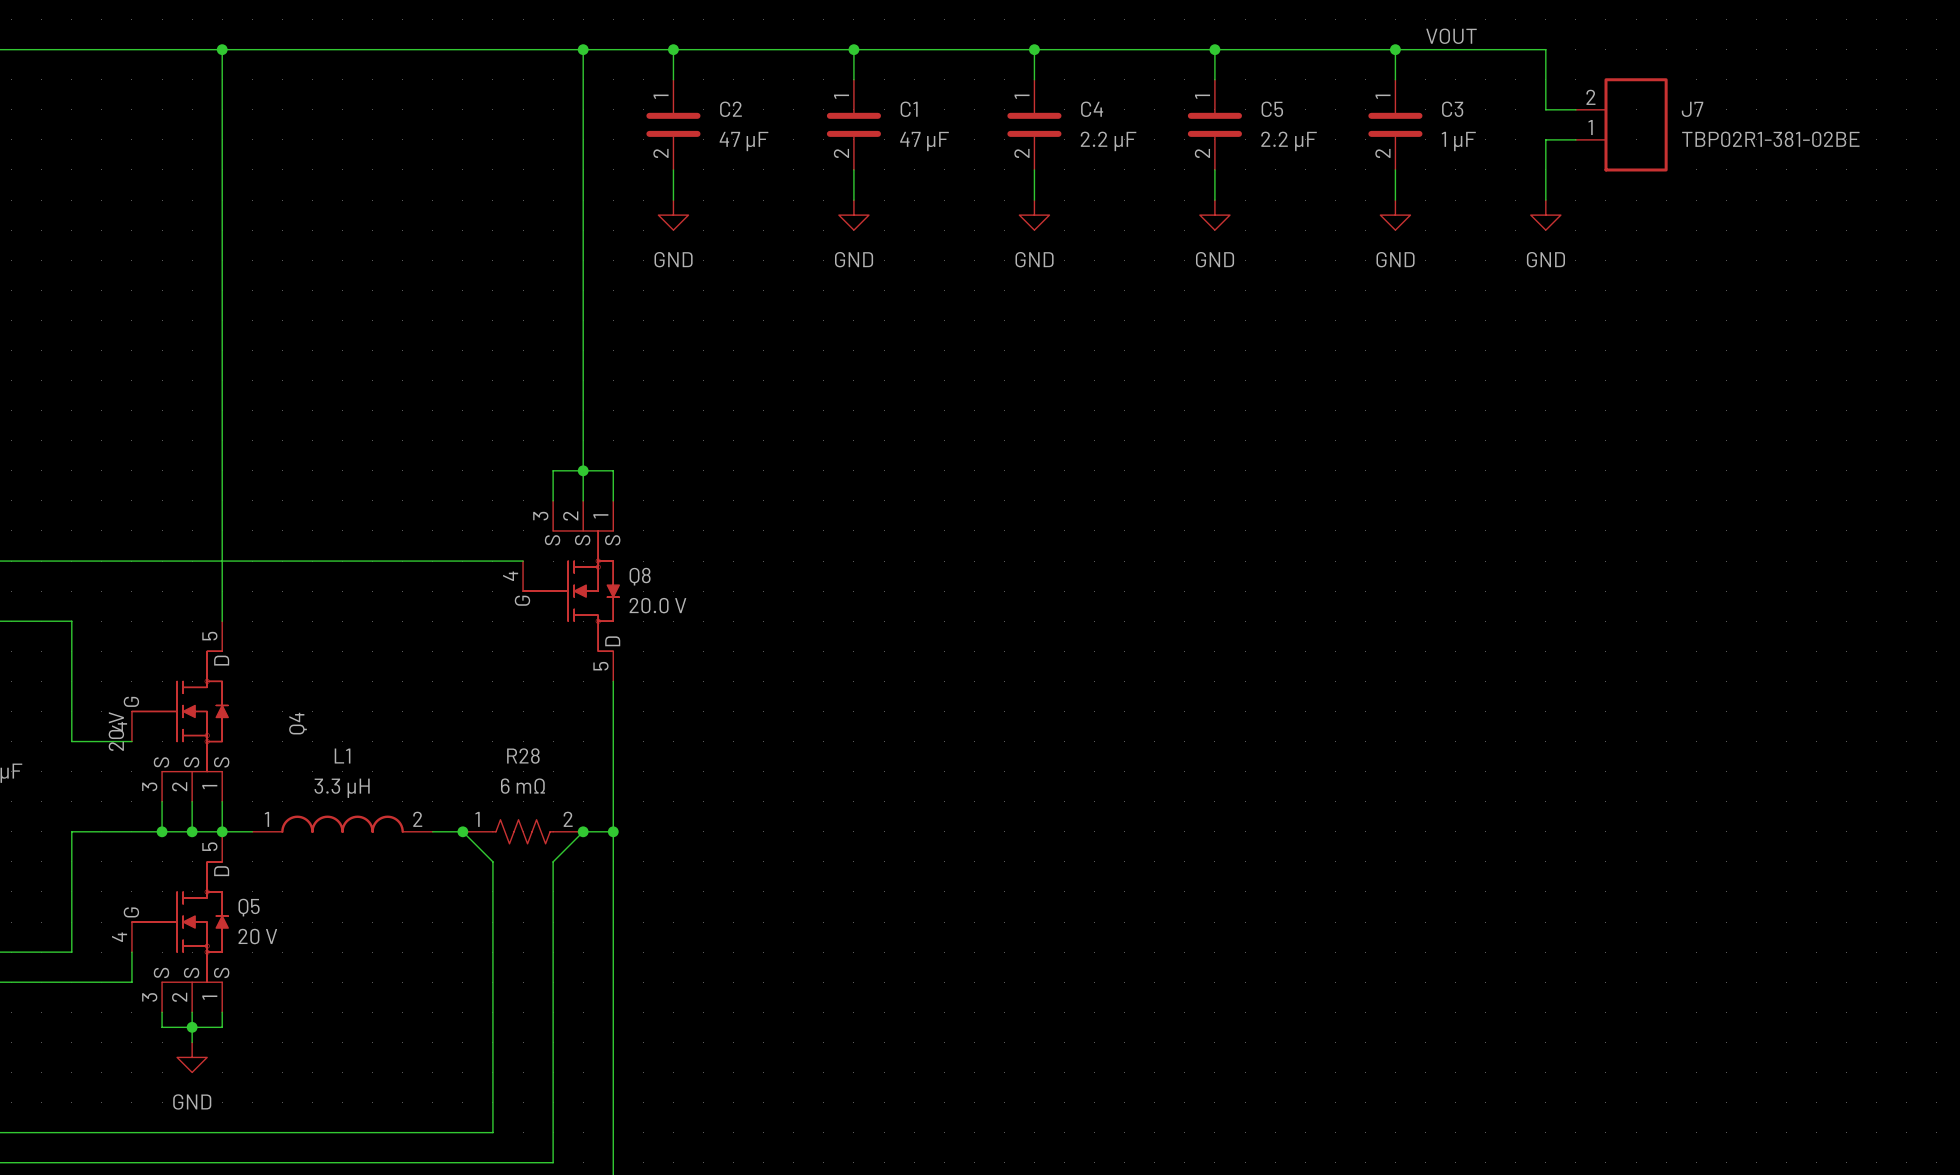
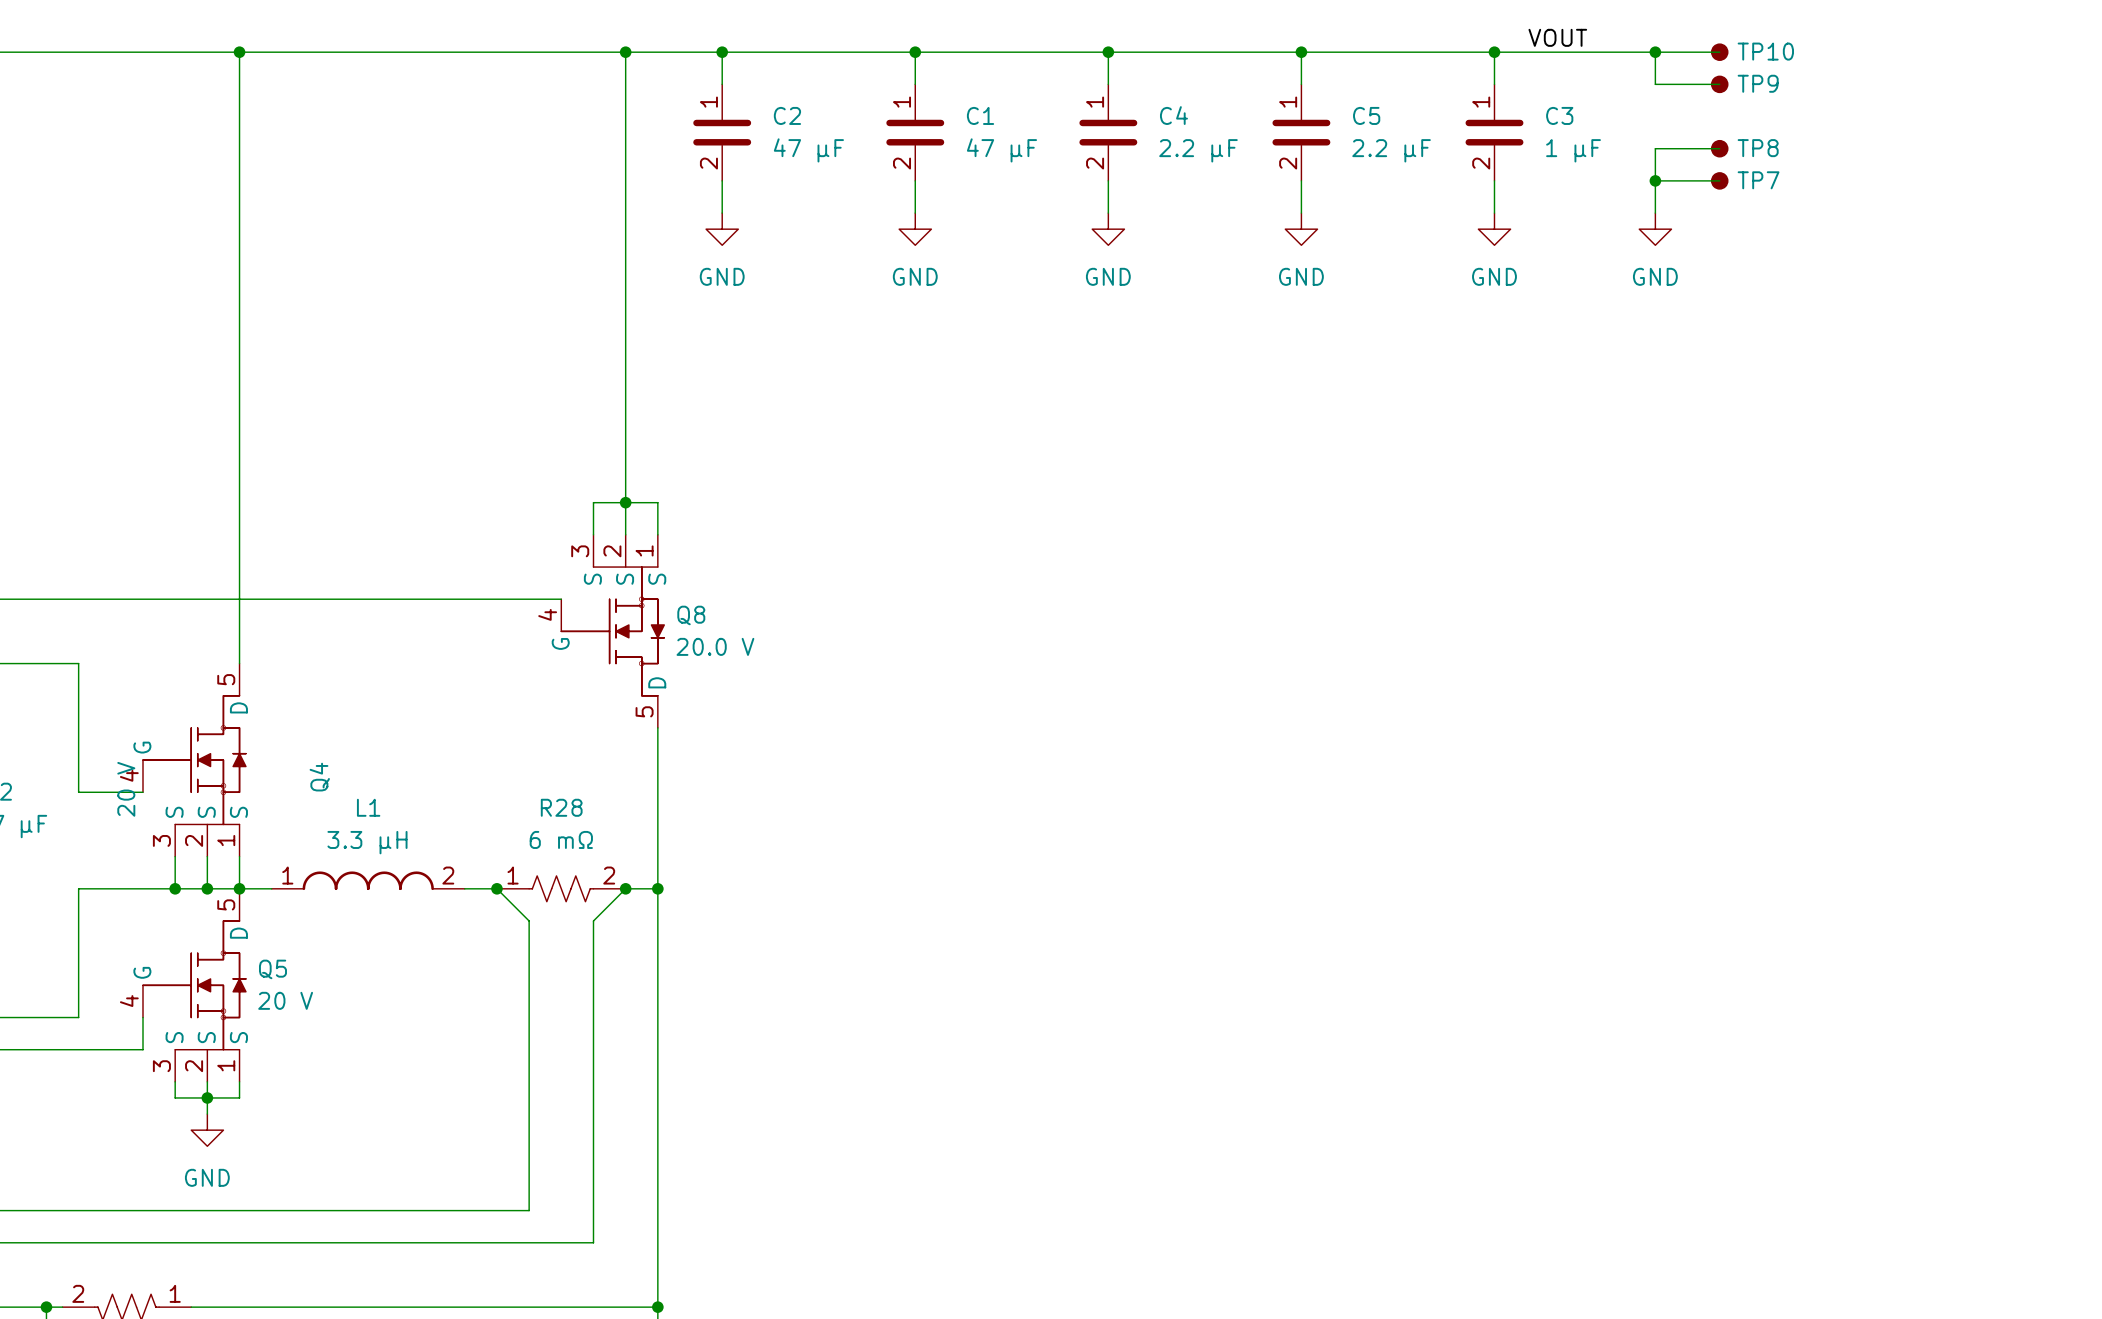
wire: none -> (1655, 52) (1719, 52)
junction: none -> (1655, 52)
TP10: none -> (1719, 52)
wire: (1545, 79) (1545, 109) (1575, 109) -> (1655, 84) (1719, 84)
TP9: none -> (1719, 84)
J7: TBP02R1-381-02BE (1621, 124) -> none
TP8: none -> (1719, 148)
wire: none -> (1655, 180) (1719, 180)
junction: none -> (1655, 180)
TP7: none -> (1719, 180)

